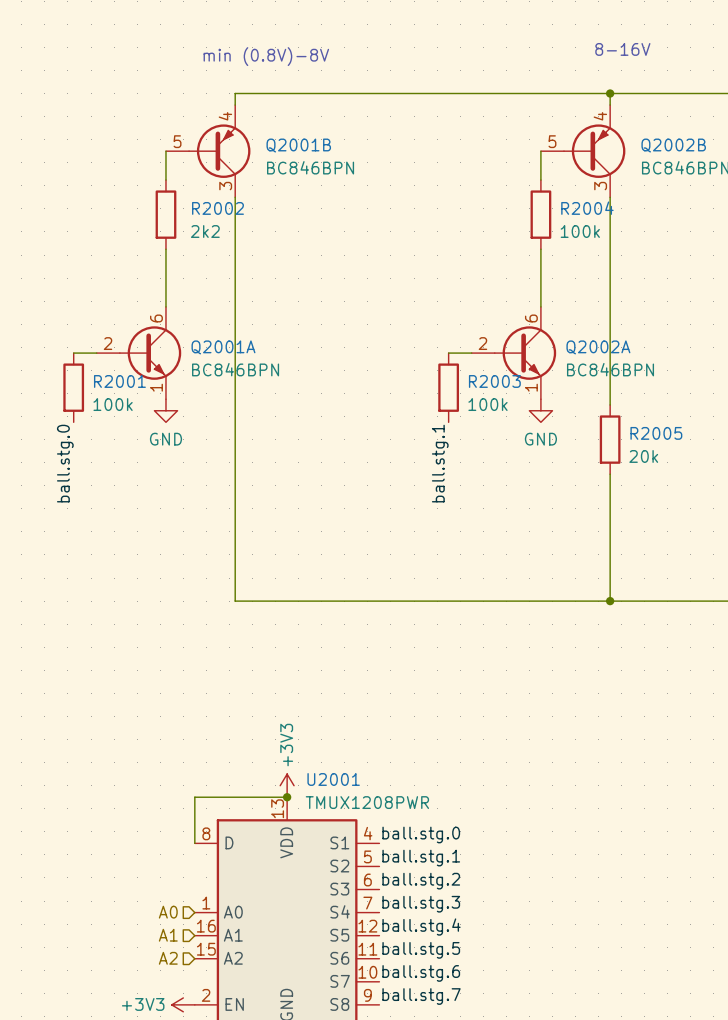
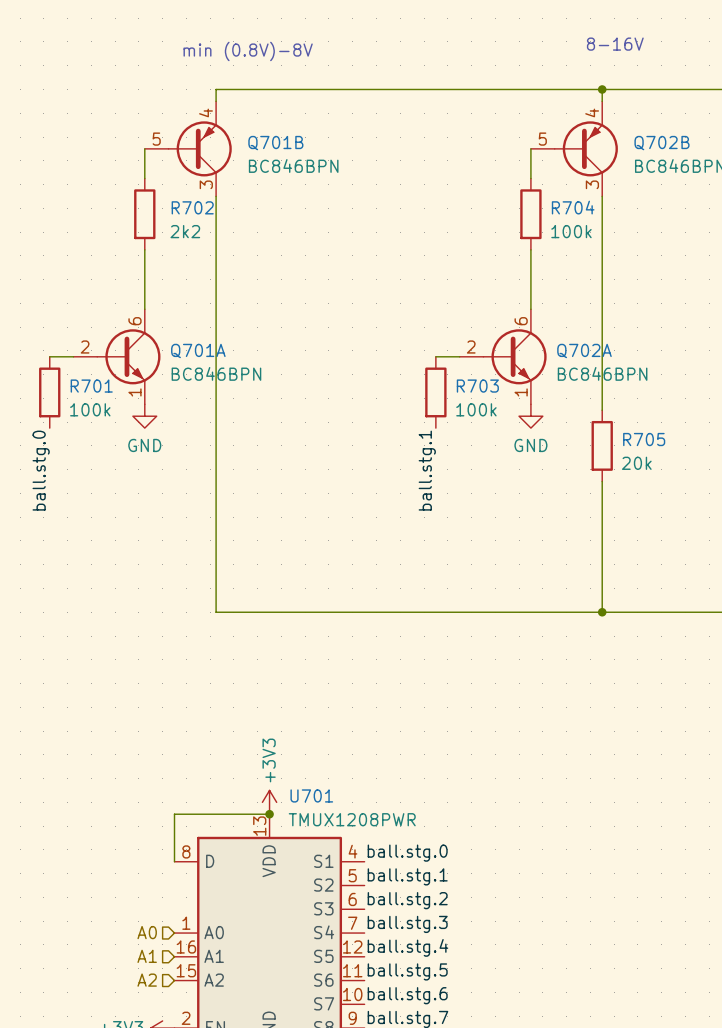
Q2001B name: Q2001B (298, 145) -> Q701B (275, 143)
Q2002B name: Q2002B (673, 145) -> Q702B (661, 143)
R2002 name: R2002 (217, 208) -> R702 (192, 207)
R2004 name: R2004 (587, 208) -> R704 (573, 207)
Q2001A name: Q2001A (223, 347) -> Q701A (198, 350)
Q2002A name: Q2002A (598, 347) -> Q702A (584, 350)
R2001 name: R2001 (119, 381) -> R701 (91, 386)
R2003 name: R2003 (494, 381) -> R703 (477, 386)
R2005 name: R2005 (656, 433) -> R705 (644, 439)
U2001 name: U2001 (333, 779) -> U701 (311, 795)

